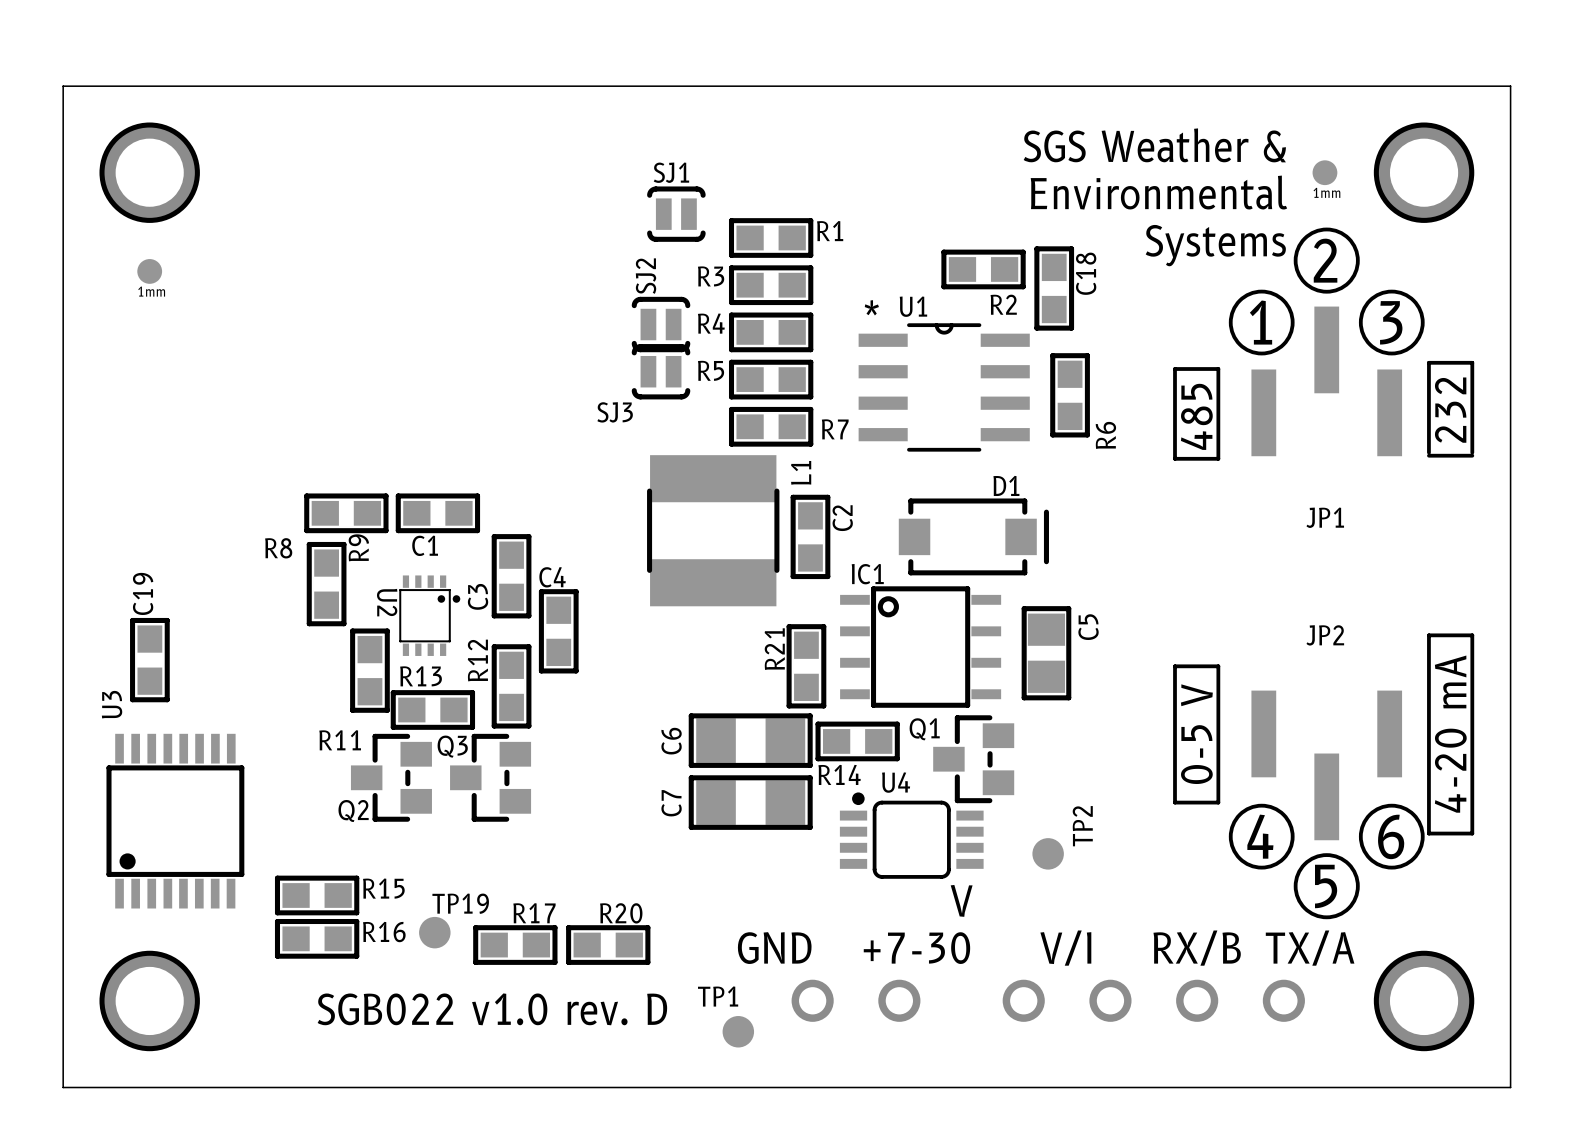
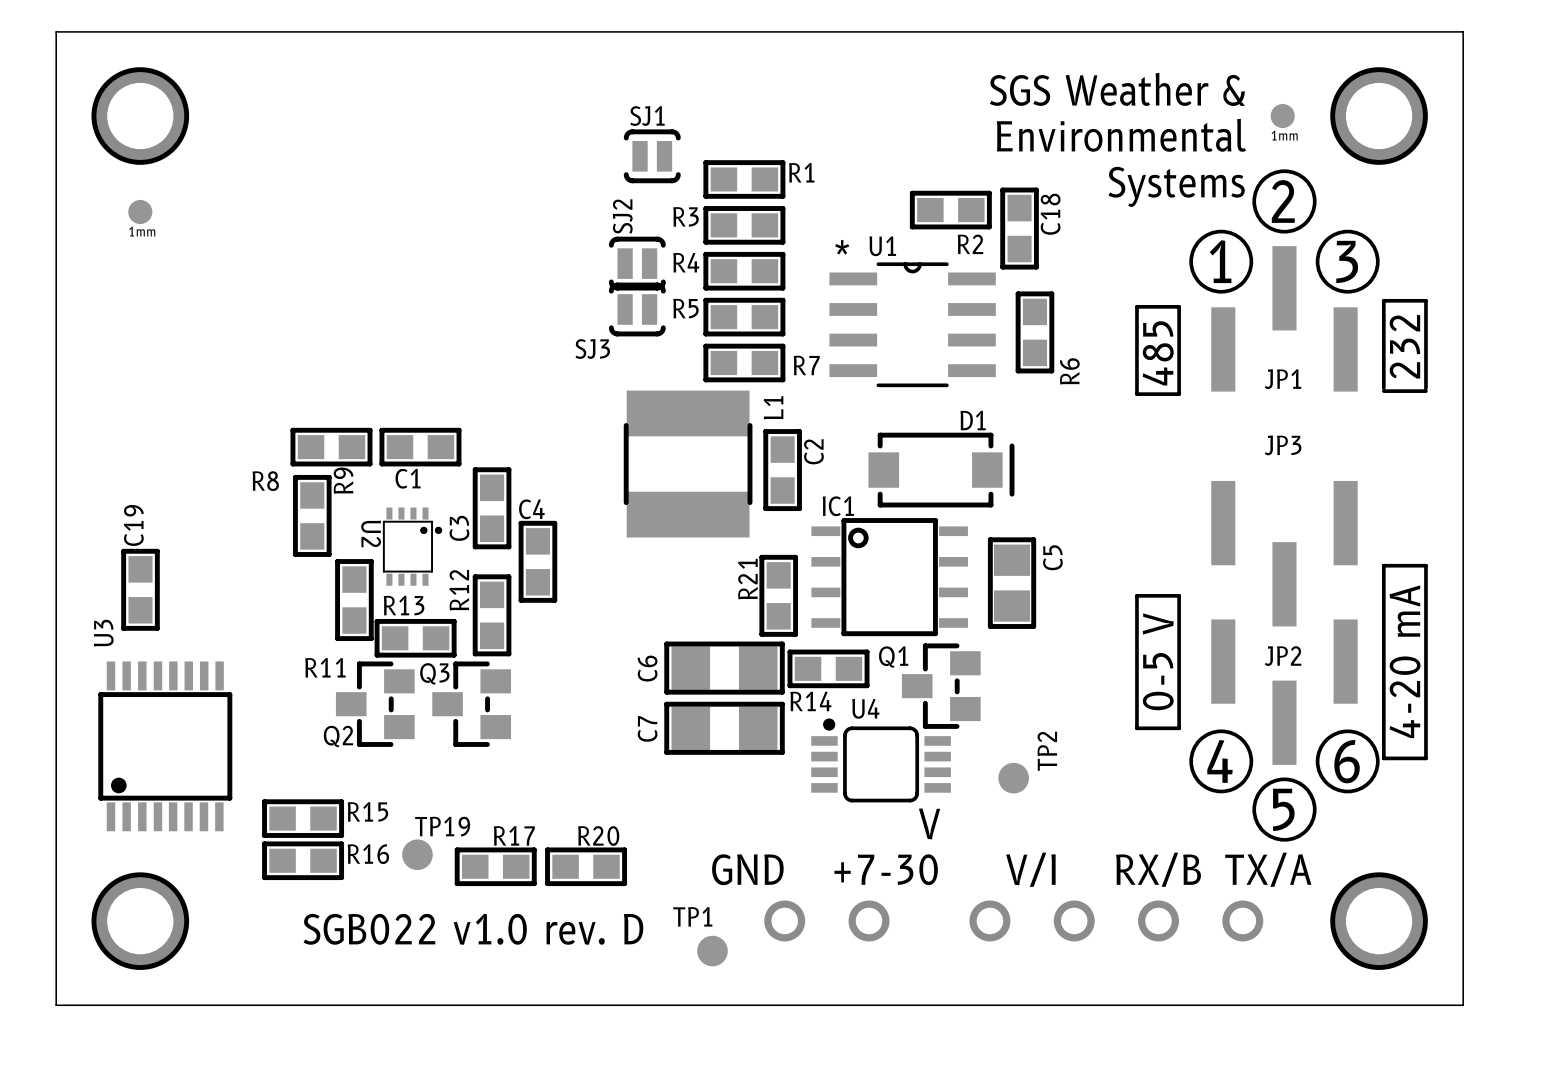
JP1 name position: JP1 (1325, 517) -> JP1 (1283, 379)
JP3: none -> (1284, 553)
JP2 name position: JP2 (1325, 635) -> JP2 (1283, 656)

